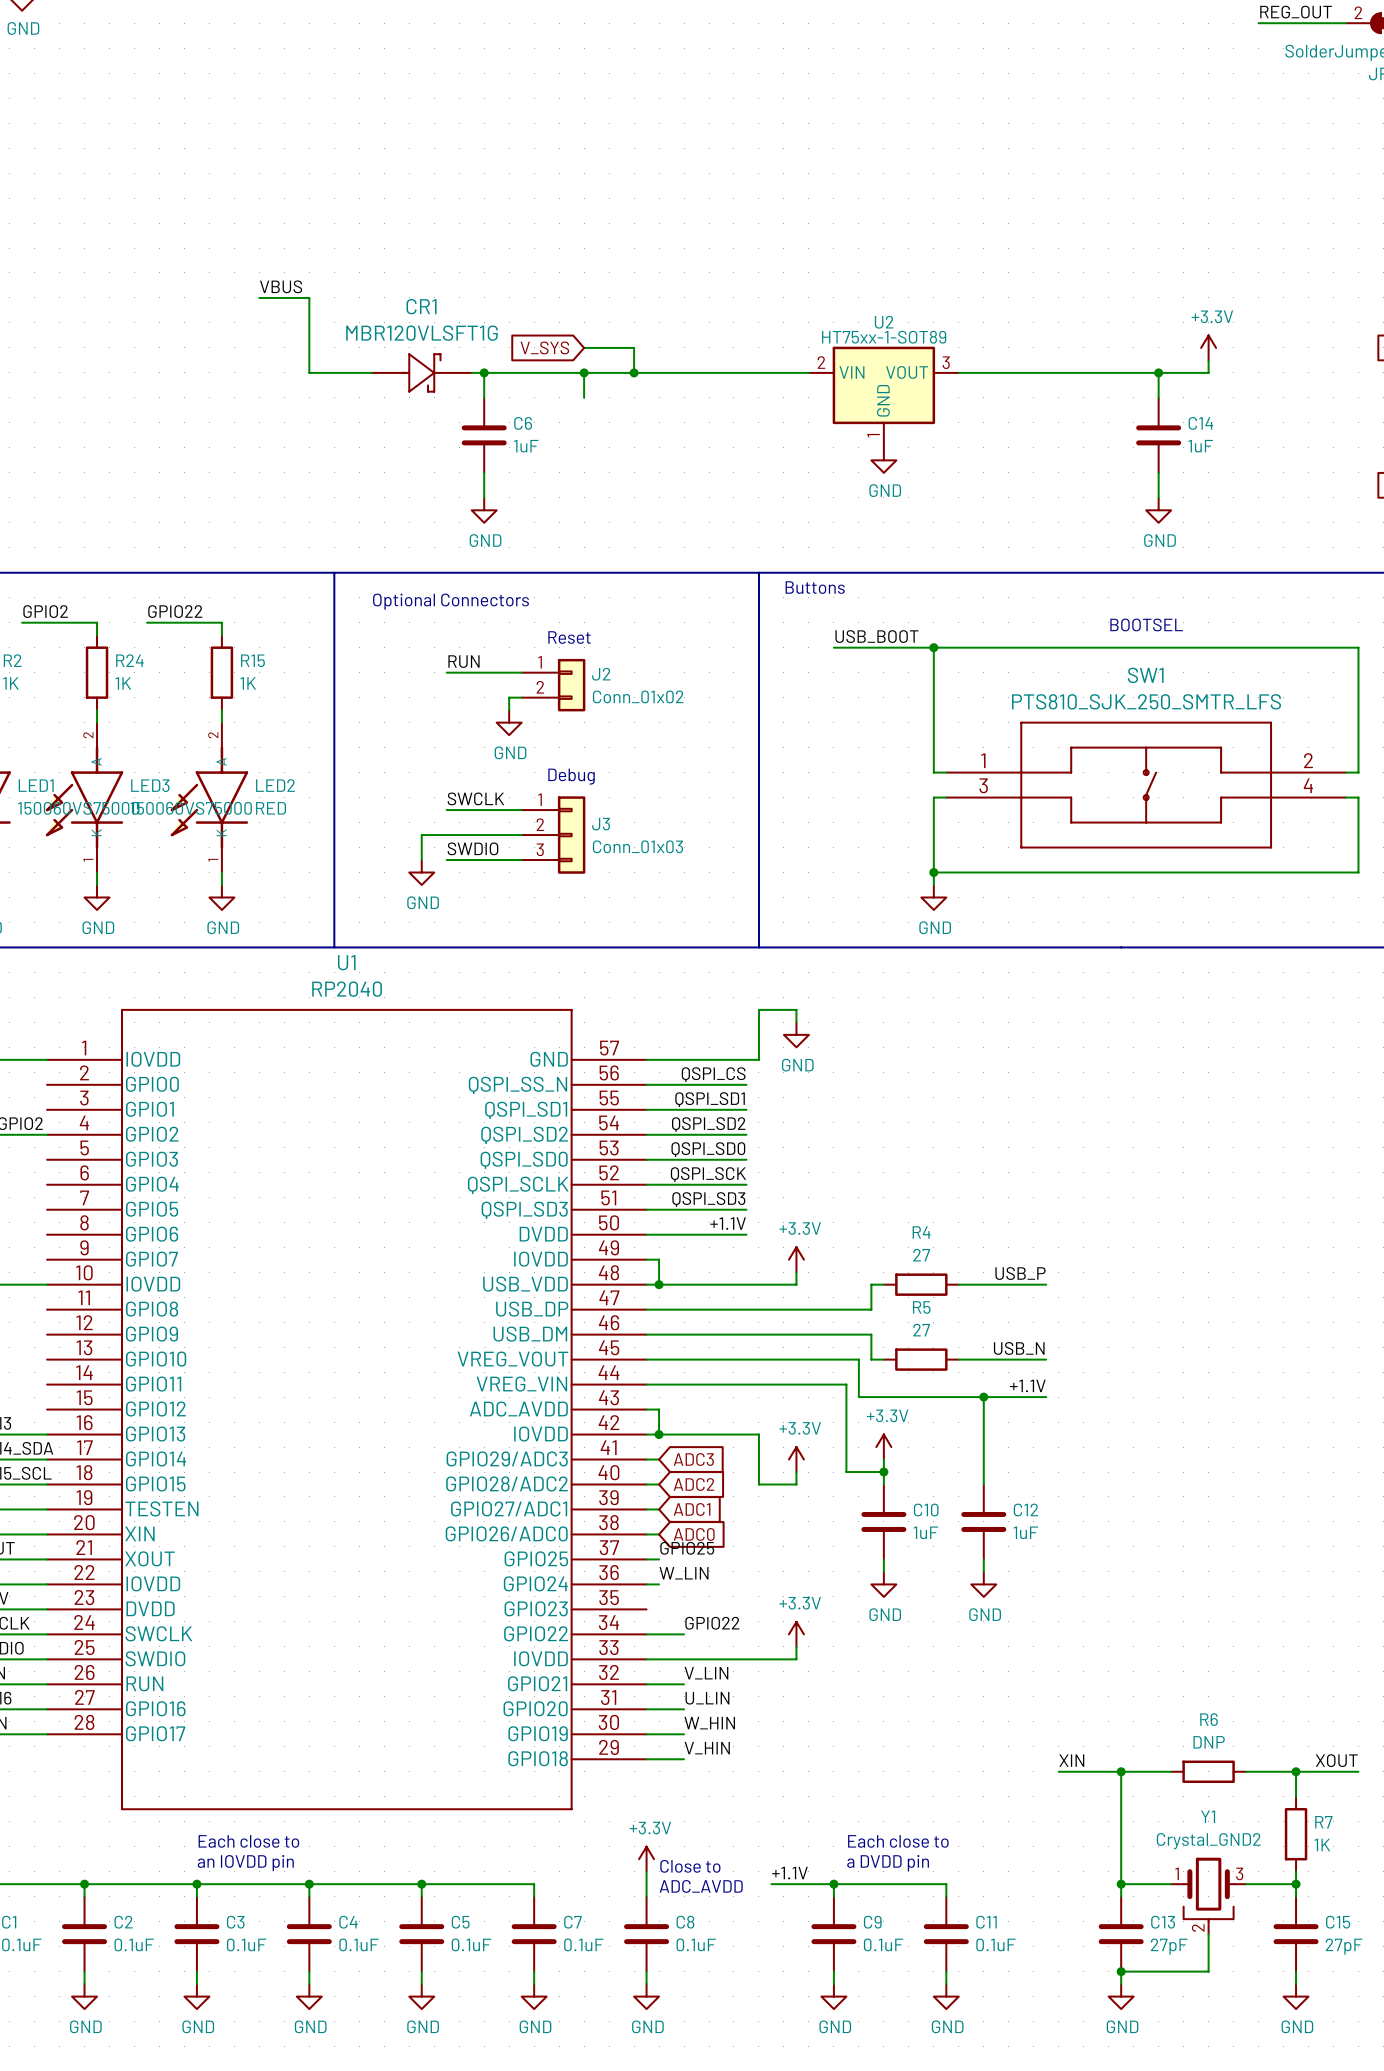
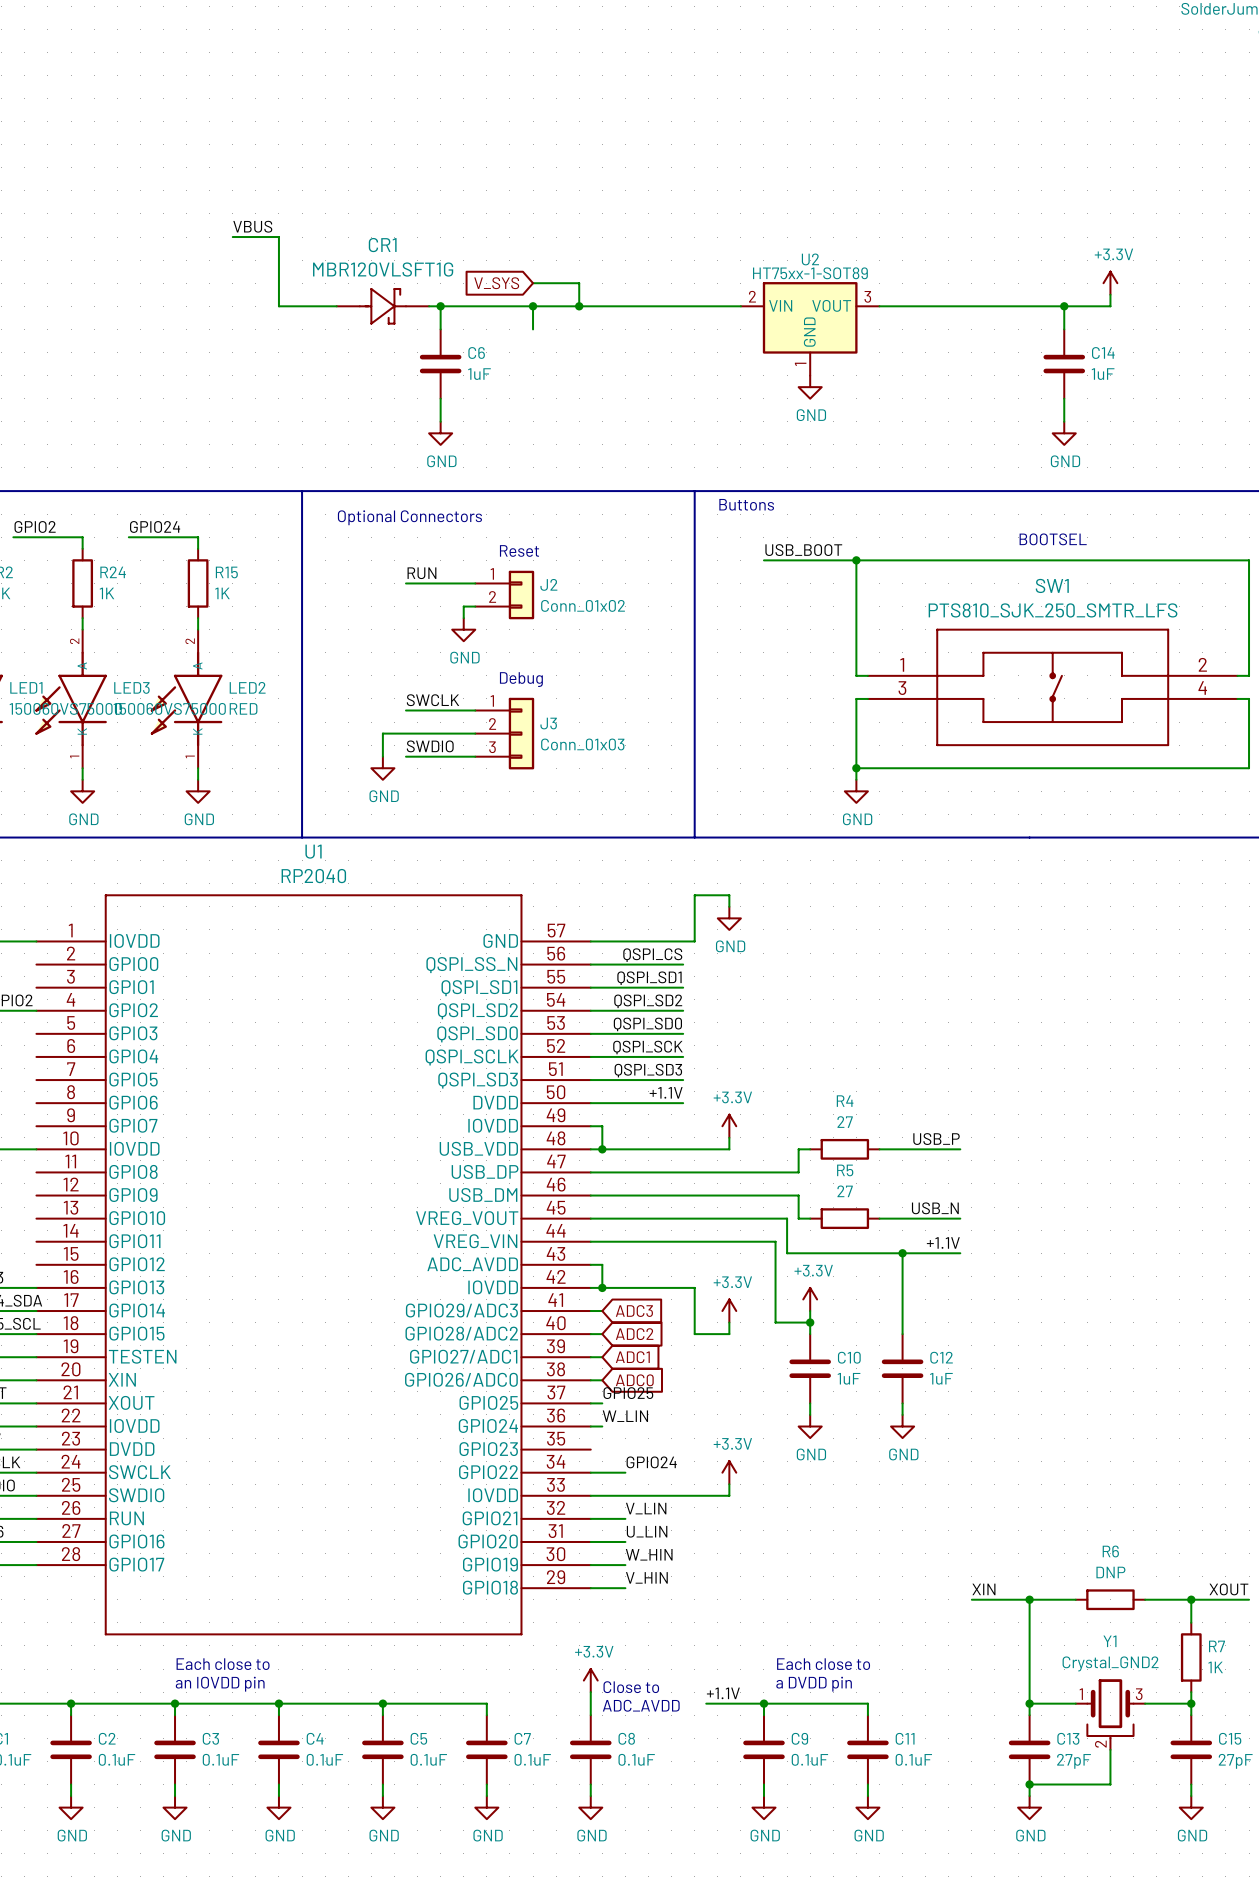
label: GPIO22 (175, 611) -> GPIO24 (155, 526)
label: GPIO22 (712, 1623) -> GPIO24 (651, 1462)

